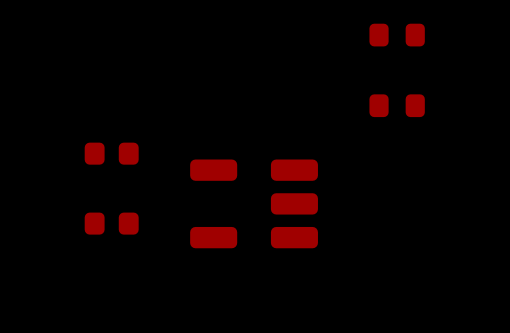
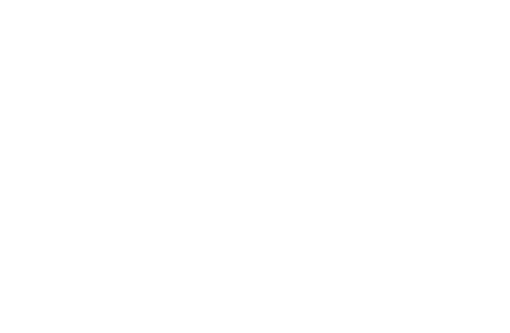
part: (397, 35) -> none
part: (397, 105) -> none
part: (111, 153) -> none
part: (254, 203) -> none
part: (111, 223) -> none

